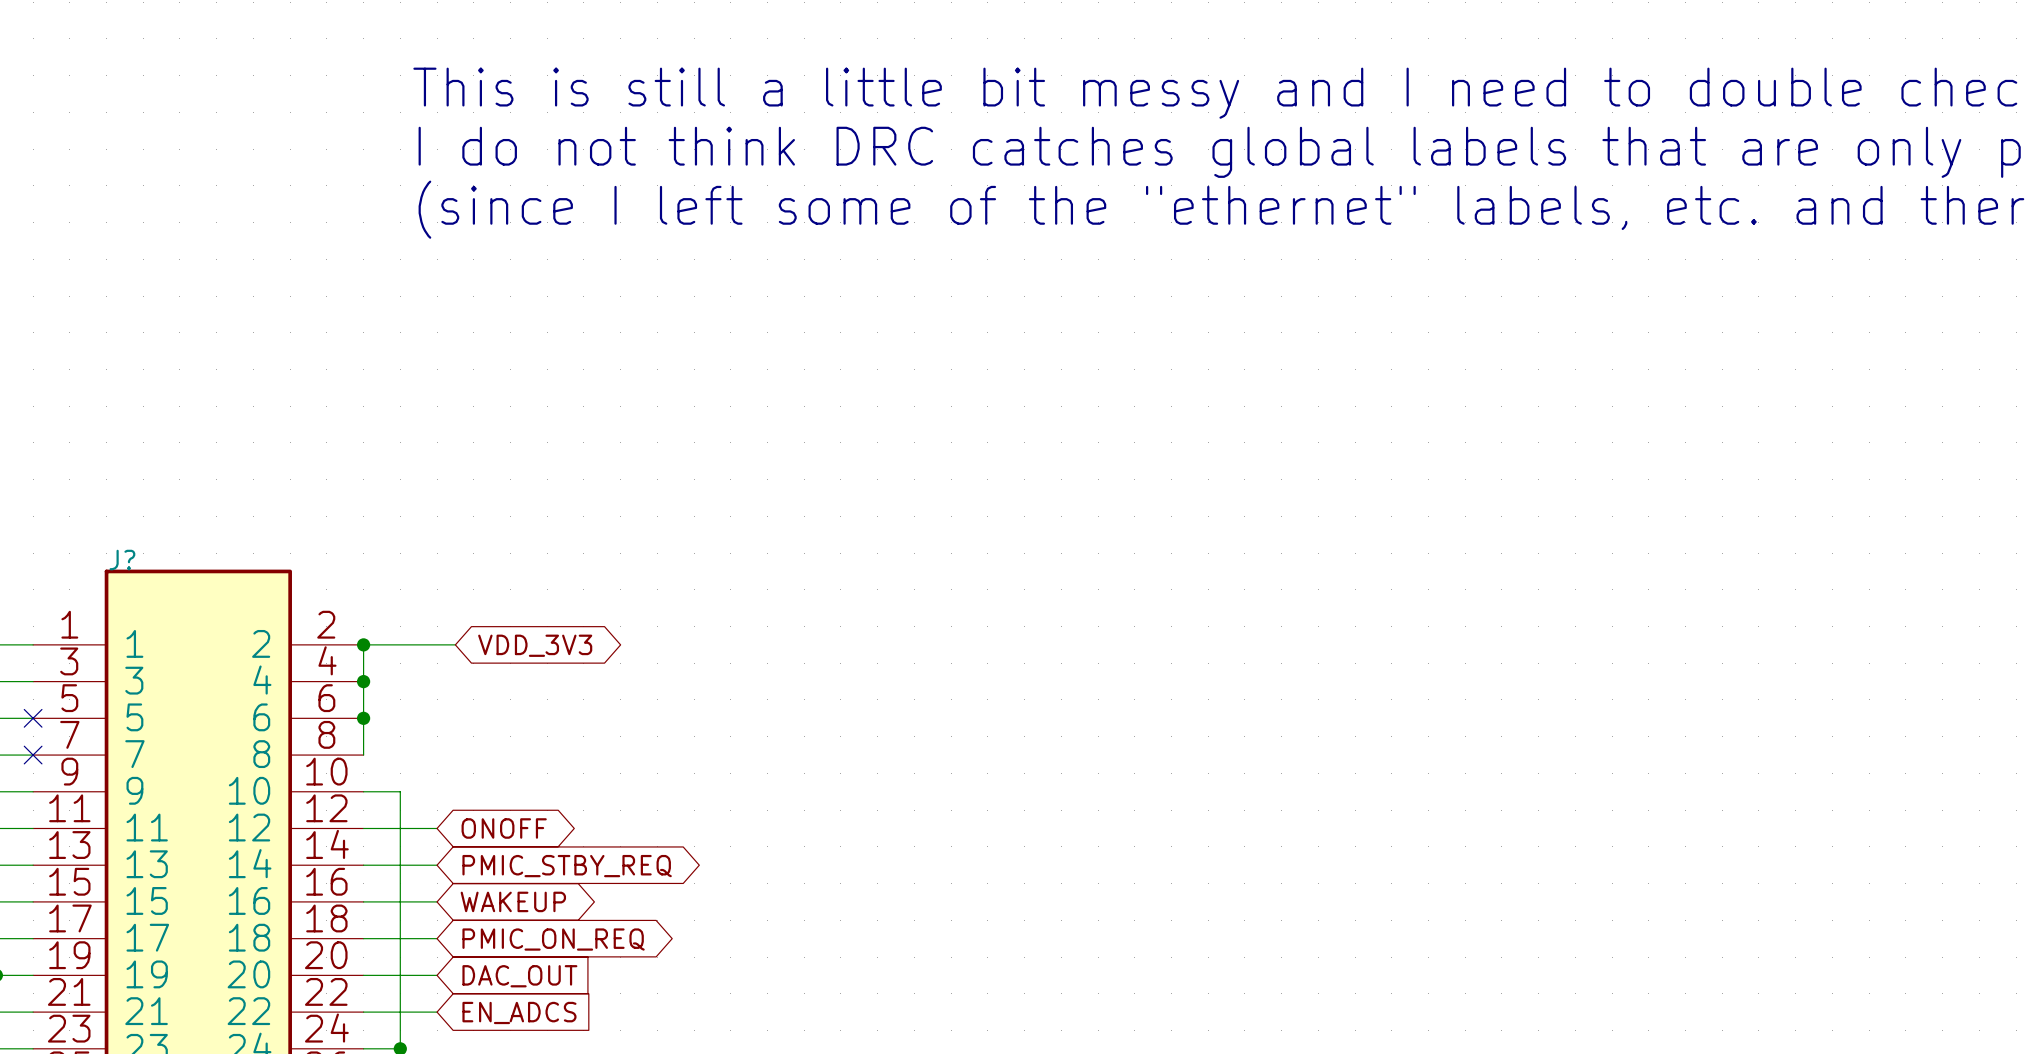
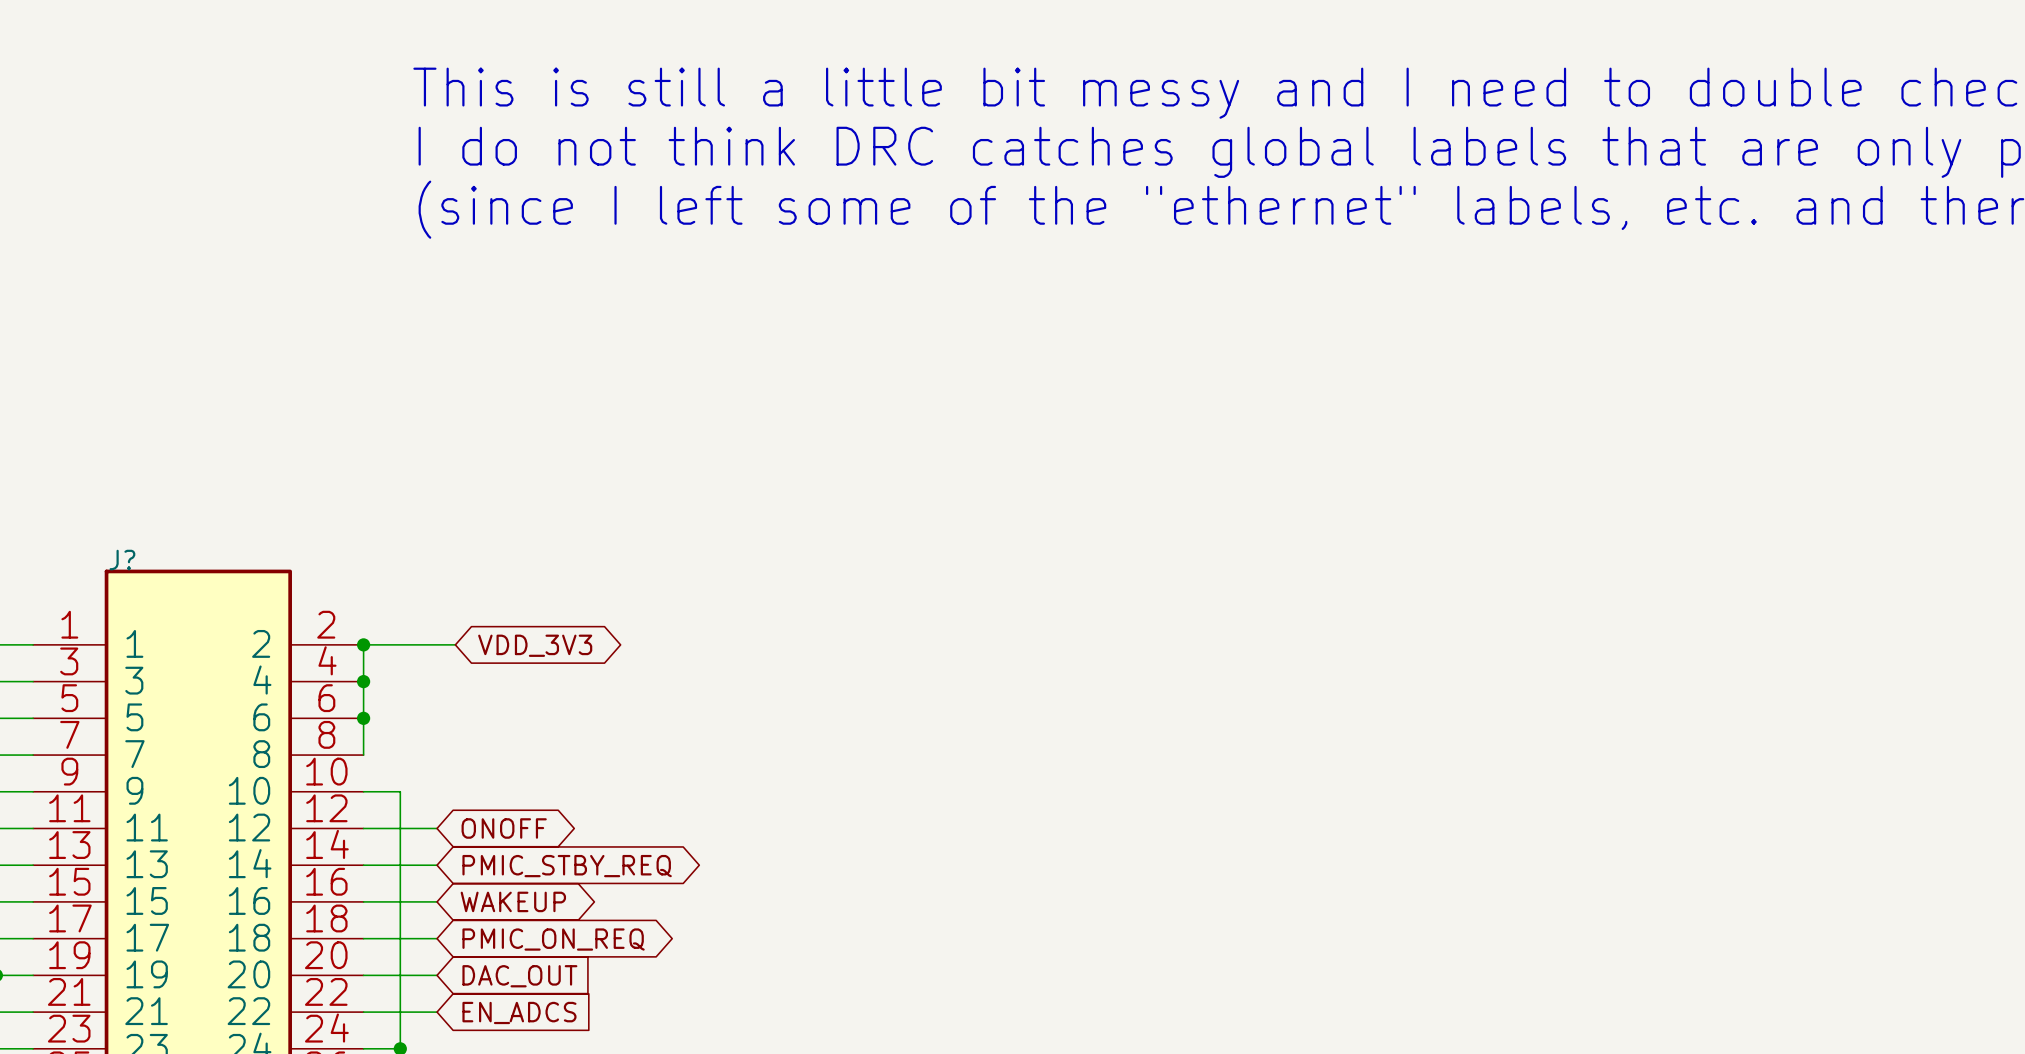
no-connect mark: (33, 718) -> none
no-connect mark: (33, 755) -> none

